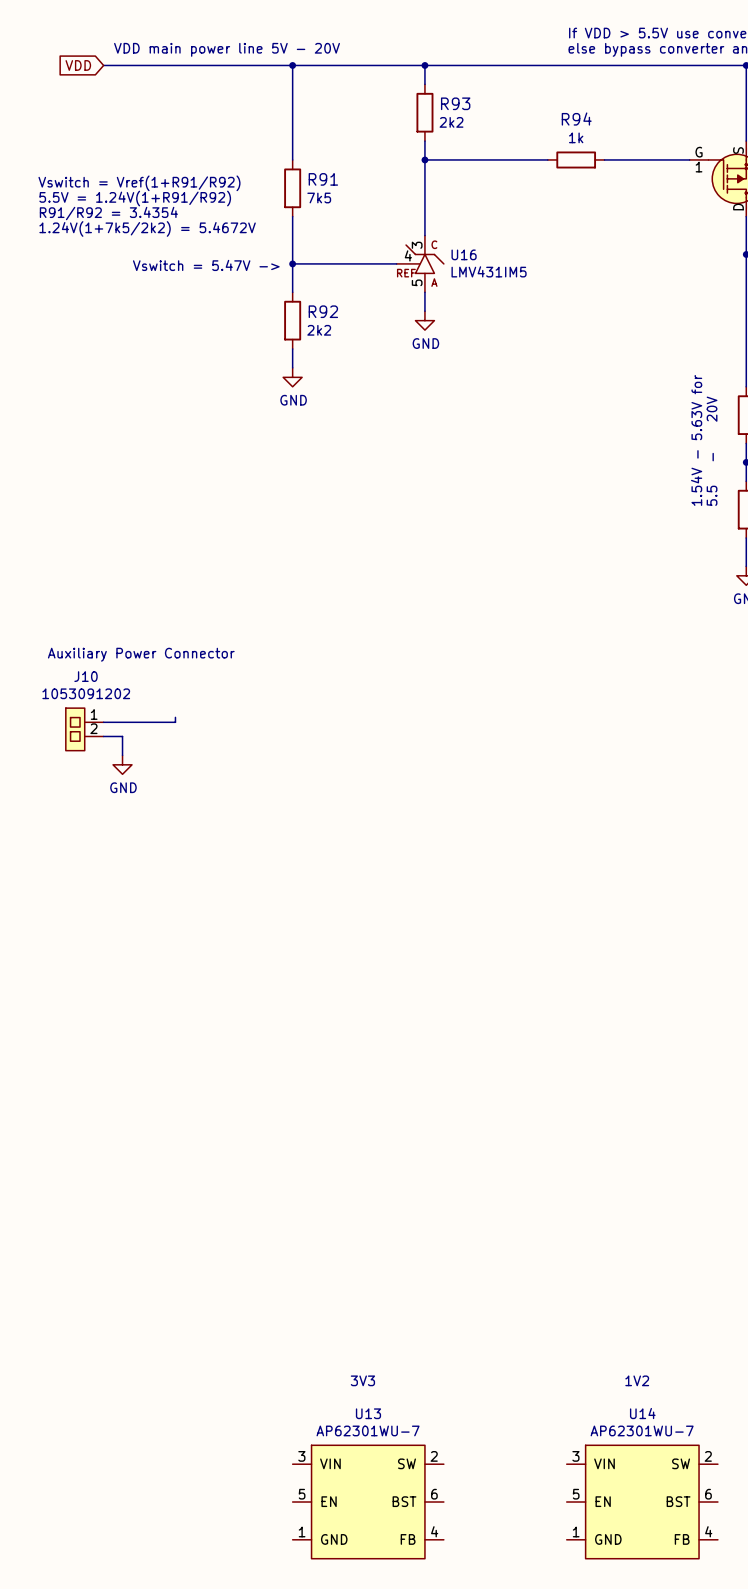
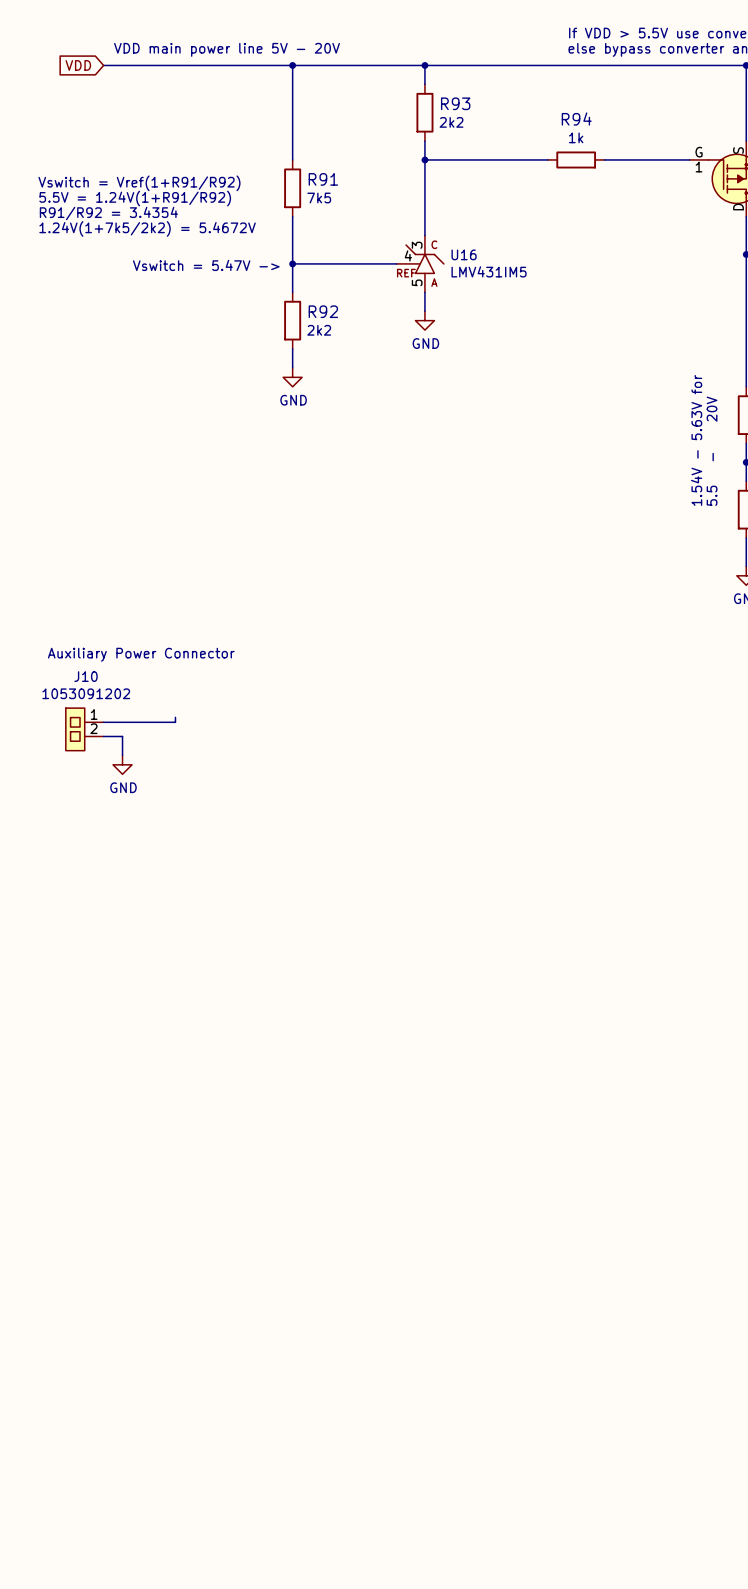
text: 3V3 (362, 1380) -> none
text: 1V2 (637, 1380) -> none
U13: AP62301WU-7 (368, 1502) -> none
U14: AP62301WU-7 (642, 1502) -> none

